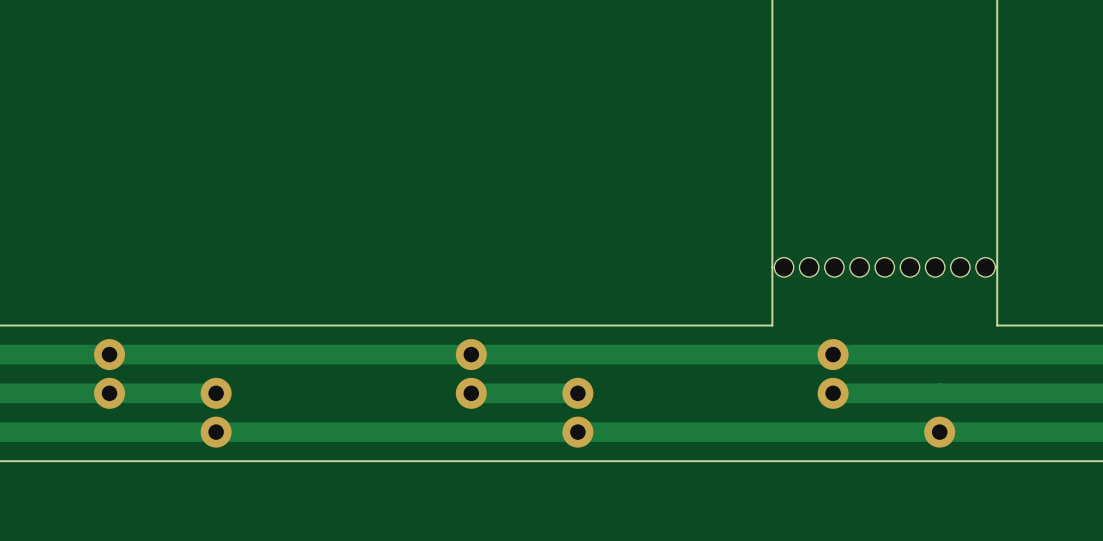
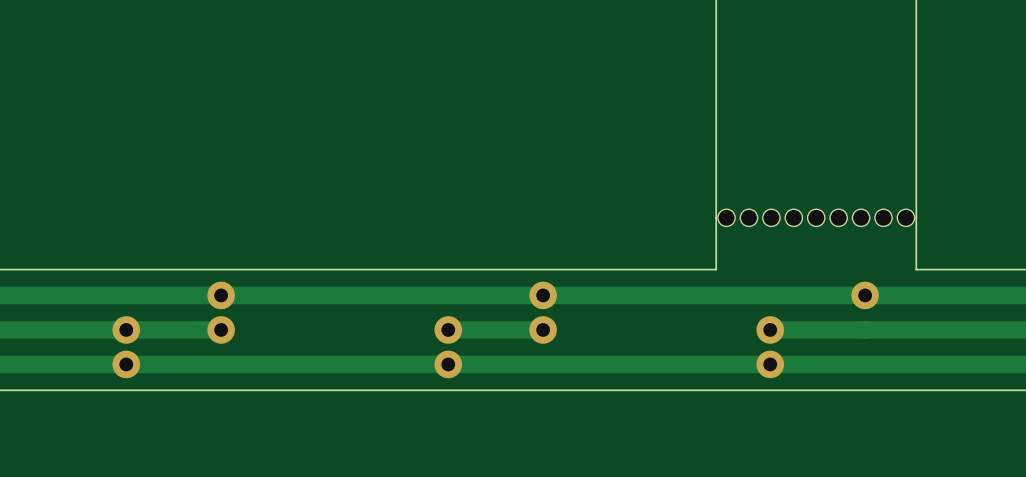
via: (109, 354) -> none
via: none -> (221, 295)
via: (471, 354) -> none
via: none -> (543, 295)
via: (833, 354) -> none
via: none -> (865, 295)
via: none -> (126, 364)
via: (216, 432) -> none
via: none -> (448, 364)
via: (577, 432) -> none
via: none -> (770, 364)
via: (939, 432) -> none

